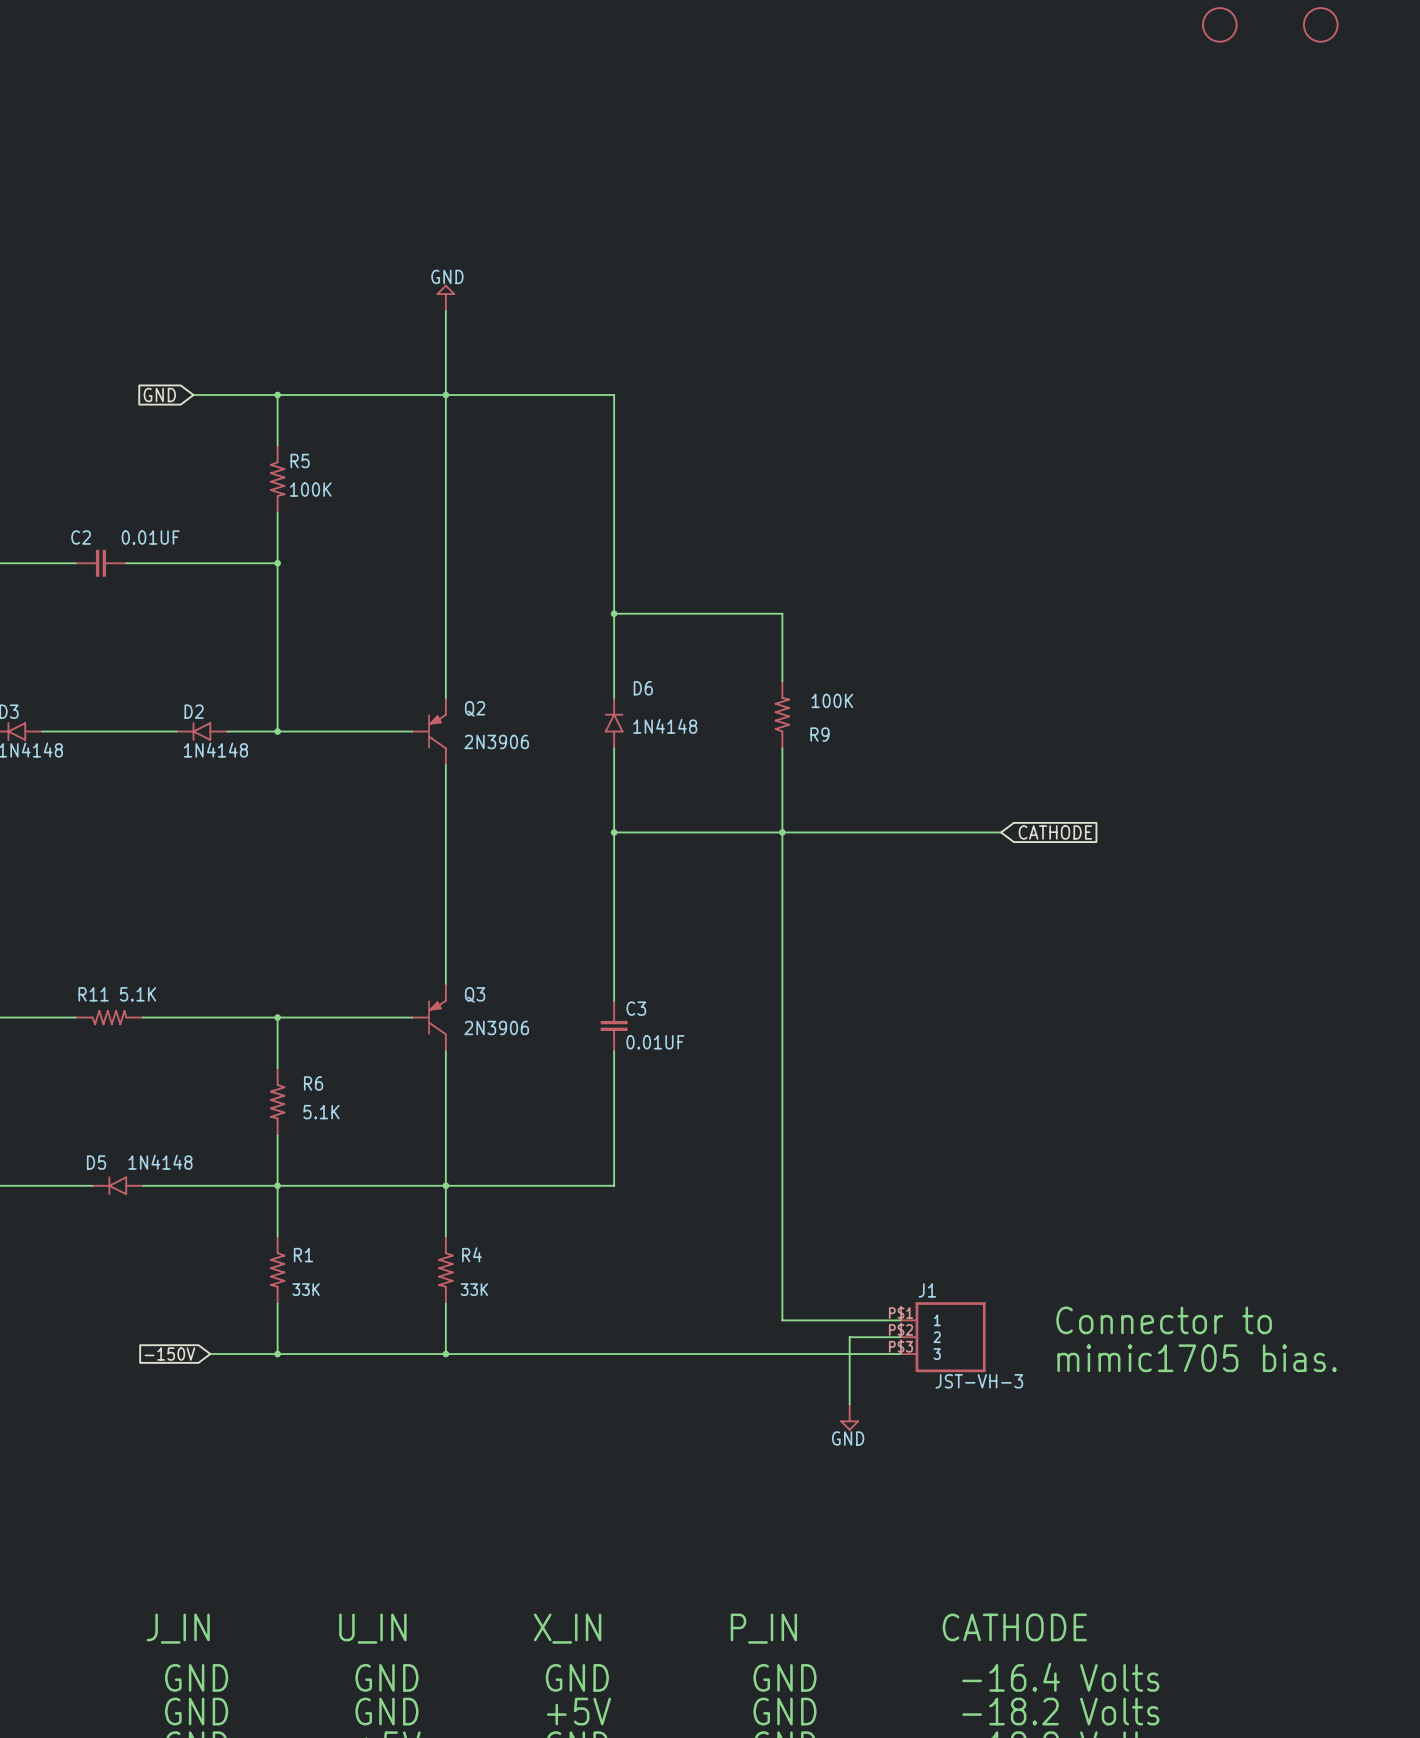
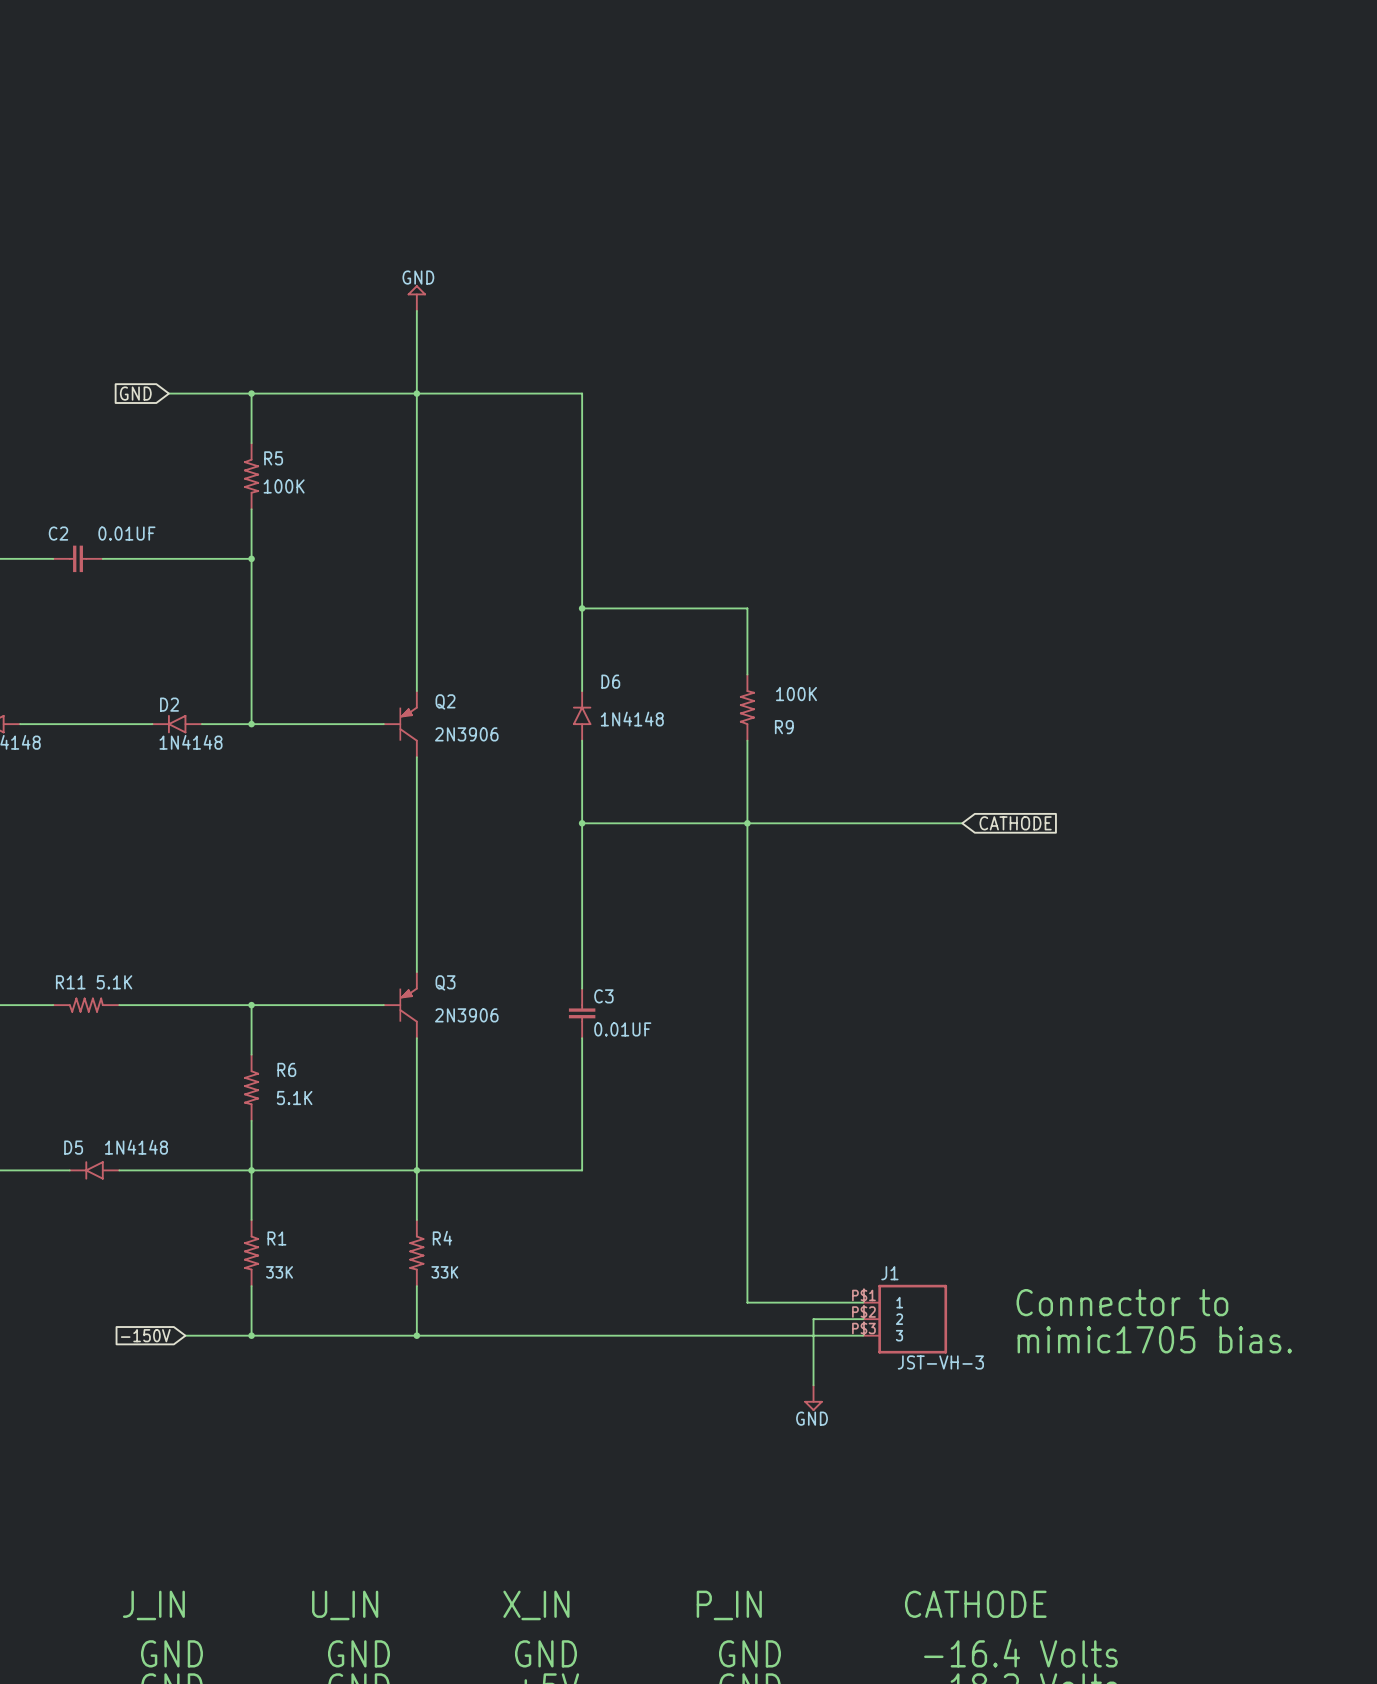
part: (1219, 24) -> none
part: (1320, 24) -> none

